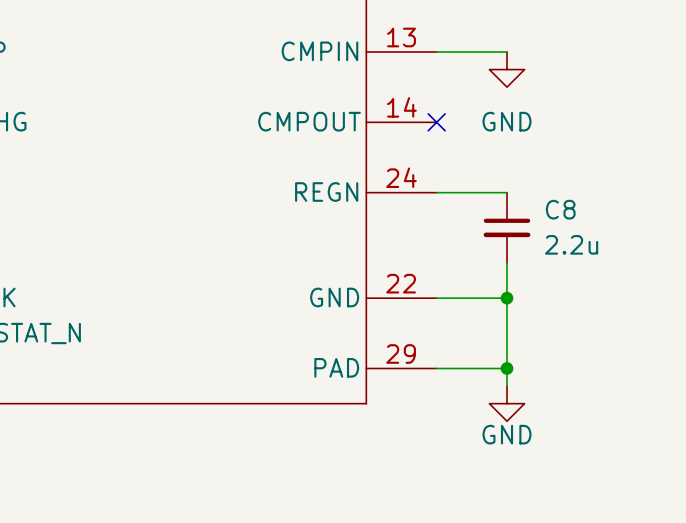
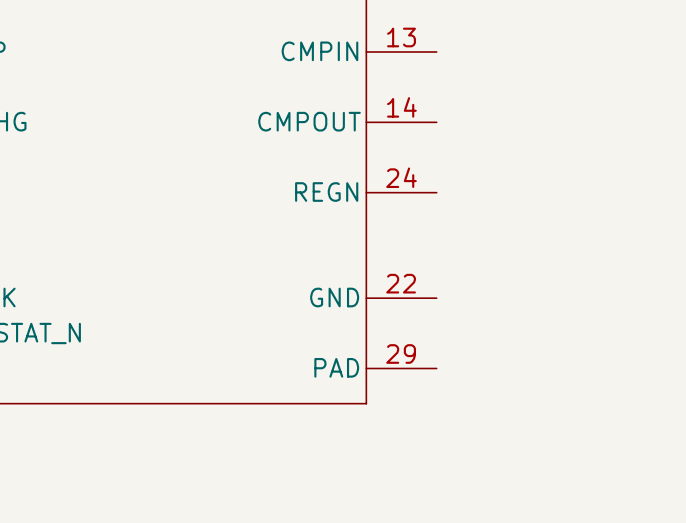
wire: (436, 52) (507, 52) -> none
power symbol: GND (507, 69) -> none
no-connect mark: (436, 122) -> none
wire: (436, 192) (507, 192) -> none
C8: 2.2u (507, 227) -> none
wire: (507, 263) (507, 386) -> none
wire: (436, 298) (507, 298) -> none
junction: (507, 298) -> none
wire: (436, 368) (507, 368) -> none
junction: (507, 368) -> none
power symbol: GND (507, 403) -> none

